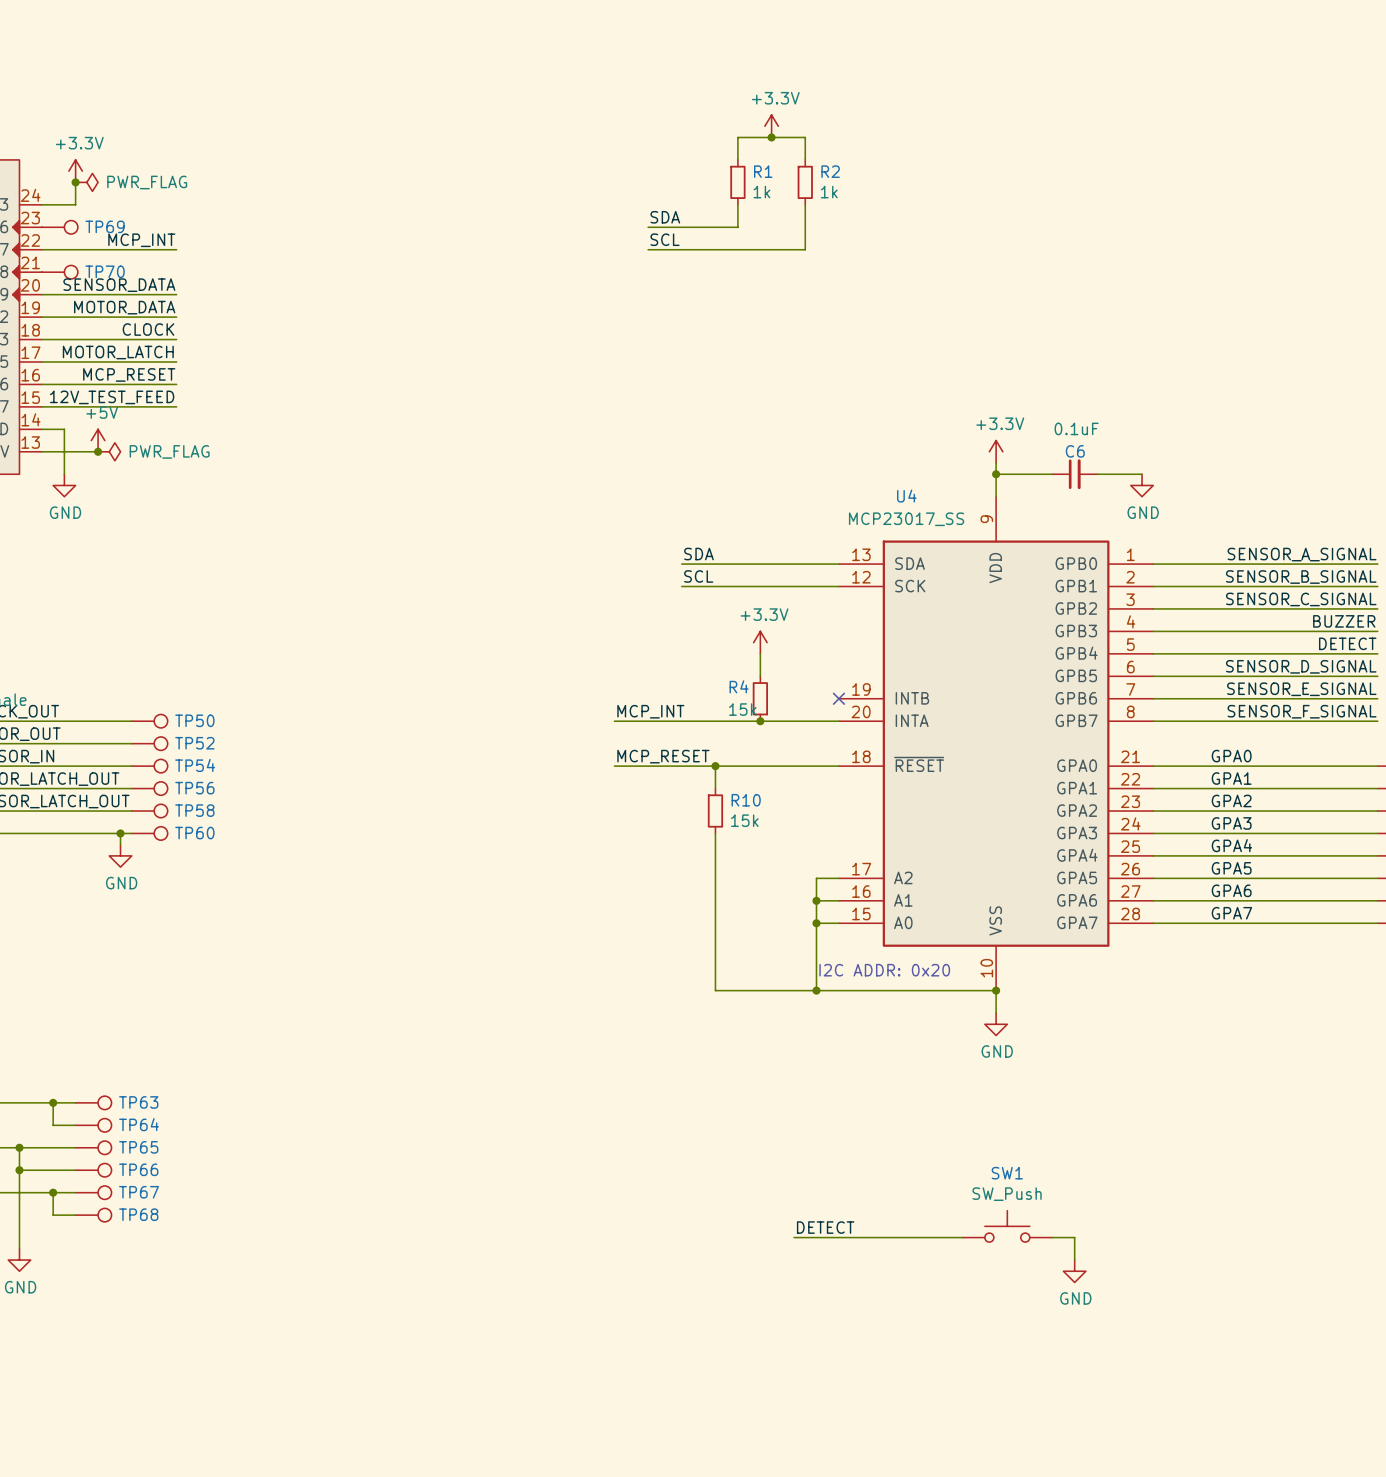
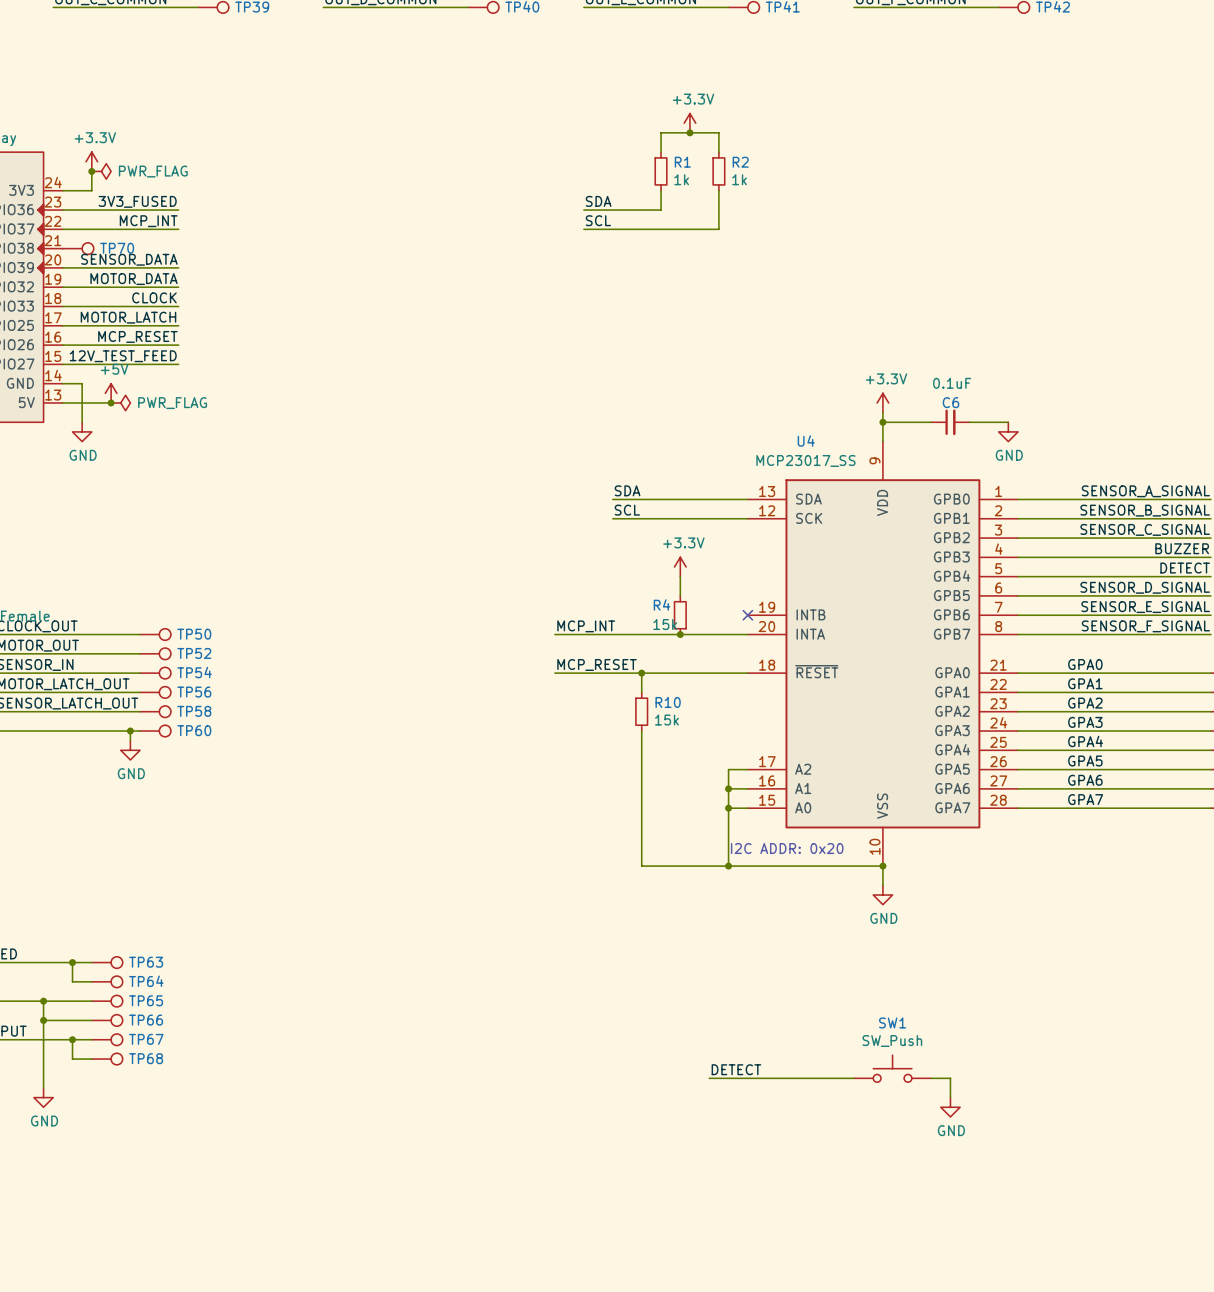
label: none -> 3V3_FUSED (137, 201)
wire: none -> (62, 210) (178, 210)
TP69: (59, 227) -> none

